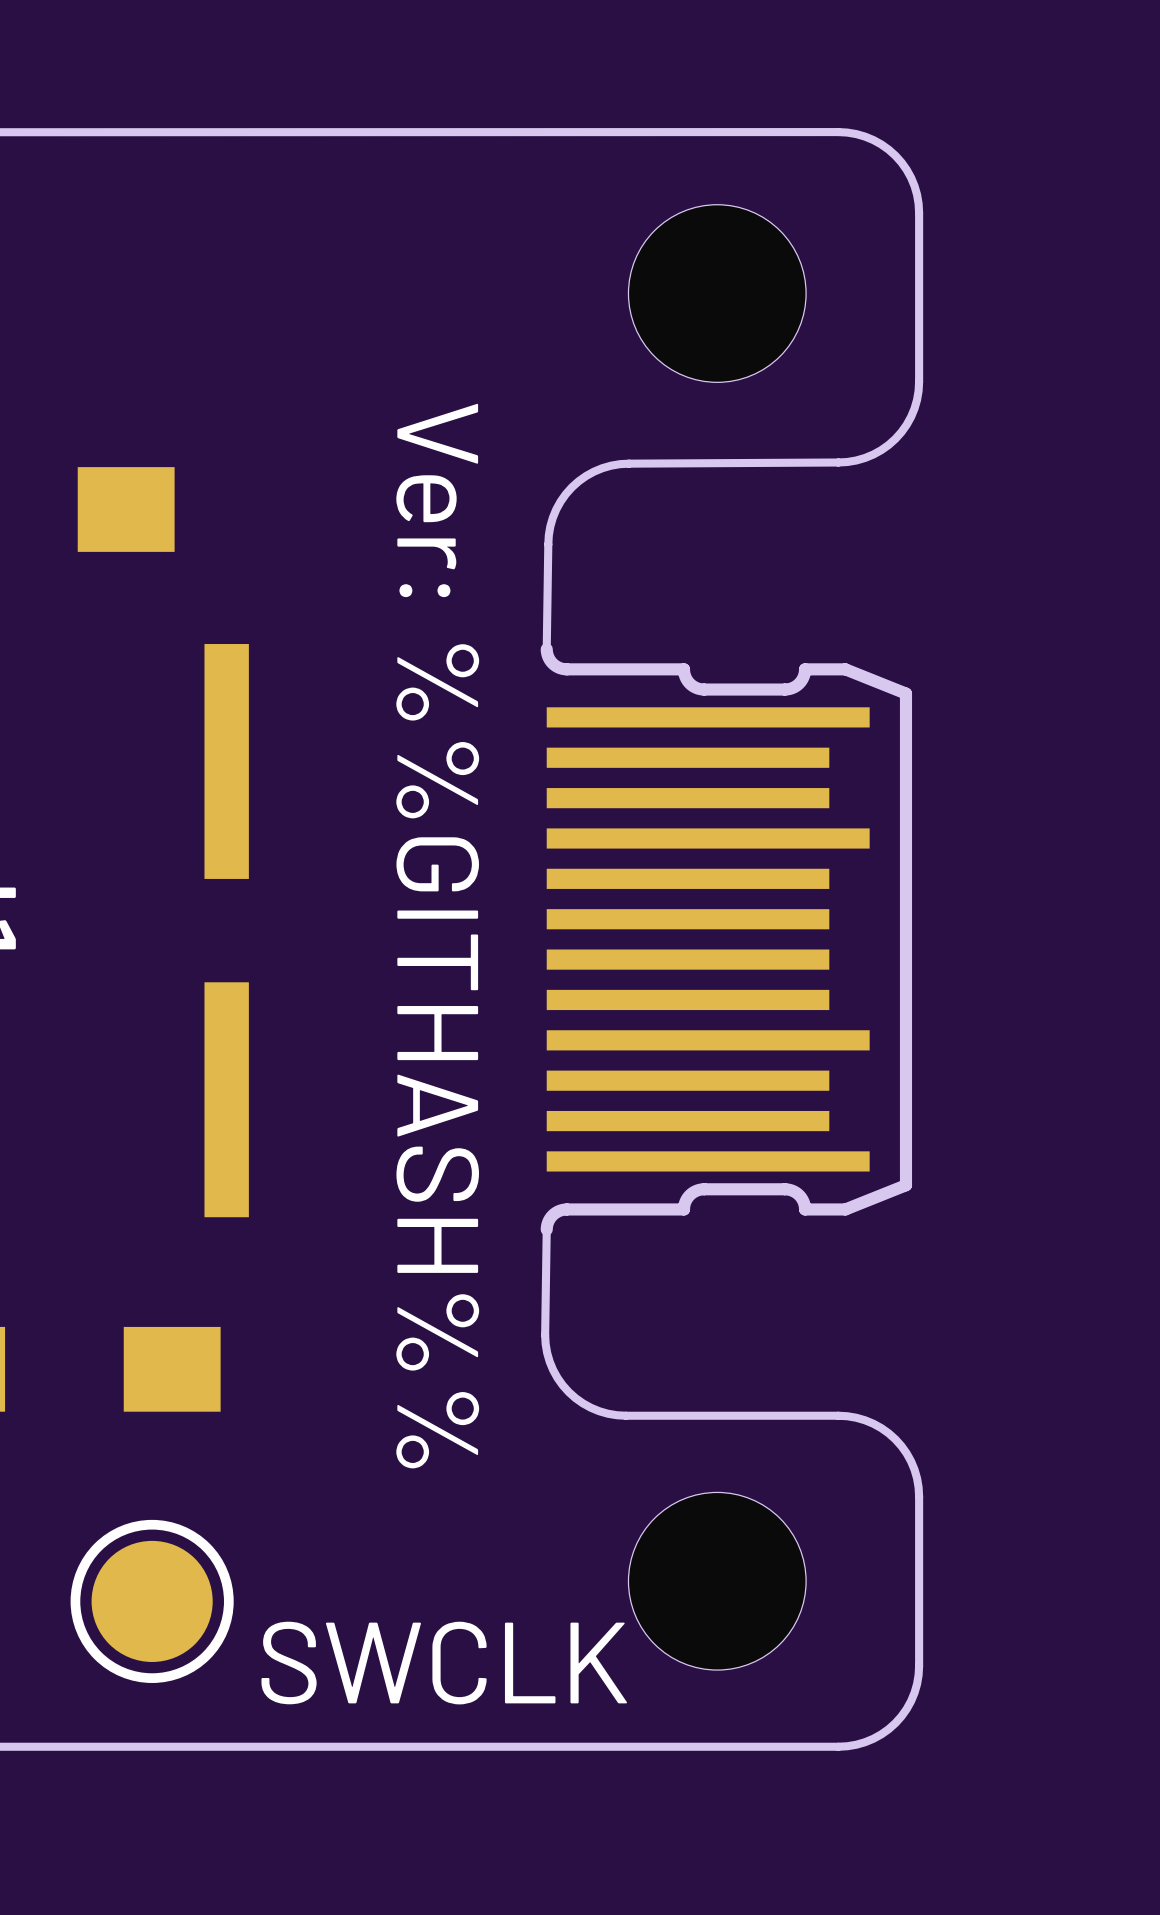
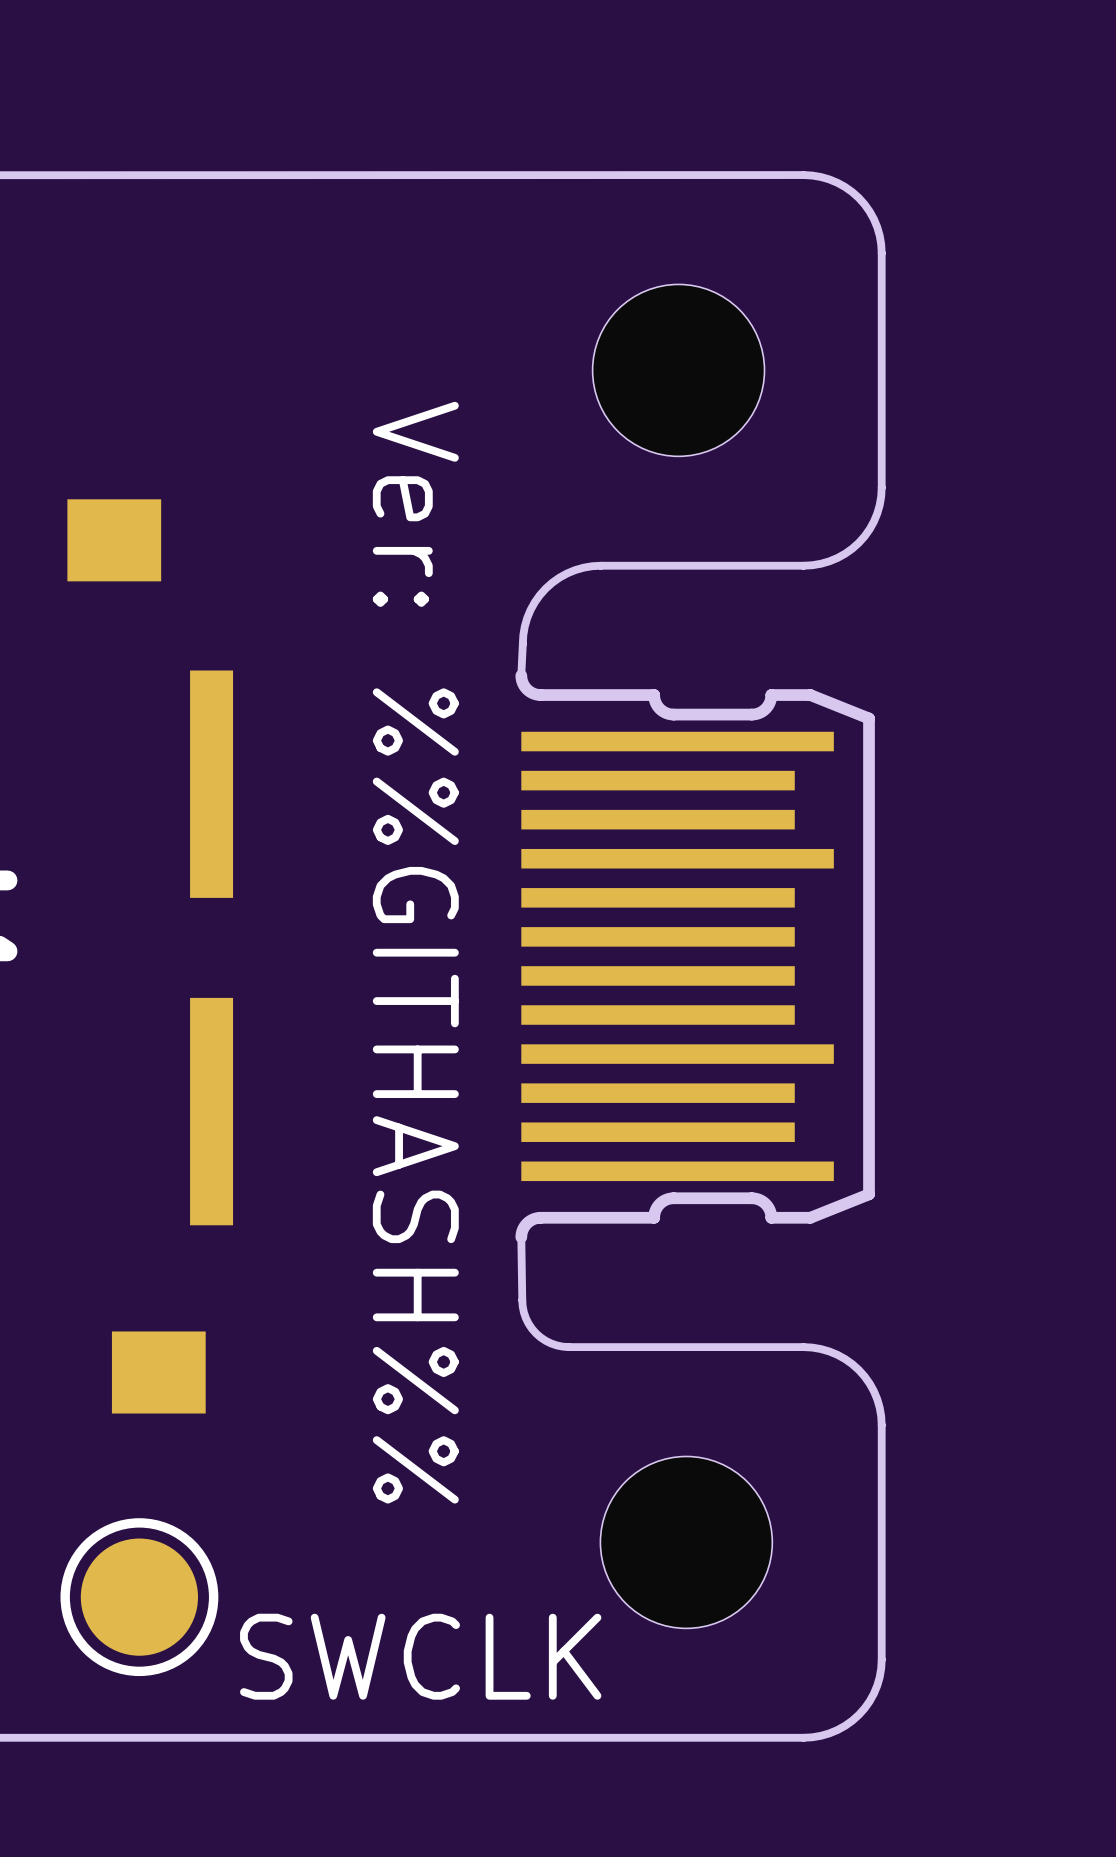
part position: (717, 293) -> (678, 370)
board edge: (919, 381) (917, 399) (906, 424) (888, 444) (865, 457) (838, 462) (620, 464) (602, 468) (578, 481) (560, 501) (550, 526) (546, 649) -> (881, 416) (881, 487) (879, 504) (869, 529) (852, 548) (829, 561) (812, 565) (600, 565) (575, 570) (559, 577) (545, 588) (530, 609) (523, 635) (521, 675)
board edge: (546, 1229) (545, 1335) (547, 1352) (557, 1377) (575, 1398) (599, 1411) (616, 1415) (838, 1415) (856, 1417) (881, 1428) (901, 1446) (914, 1469) (919, 1496) -> (521, 1237) (523, 1312) (531, 1328) (540, 1337) (551, 1343) (569, 1347) (812, 1347) (837, 1354) (852, 1364) (869, 1383) (879, 1407) (881, 1425) (881, 1495)
part position: (717, 1581) -> (686, 1542)

